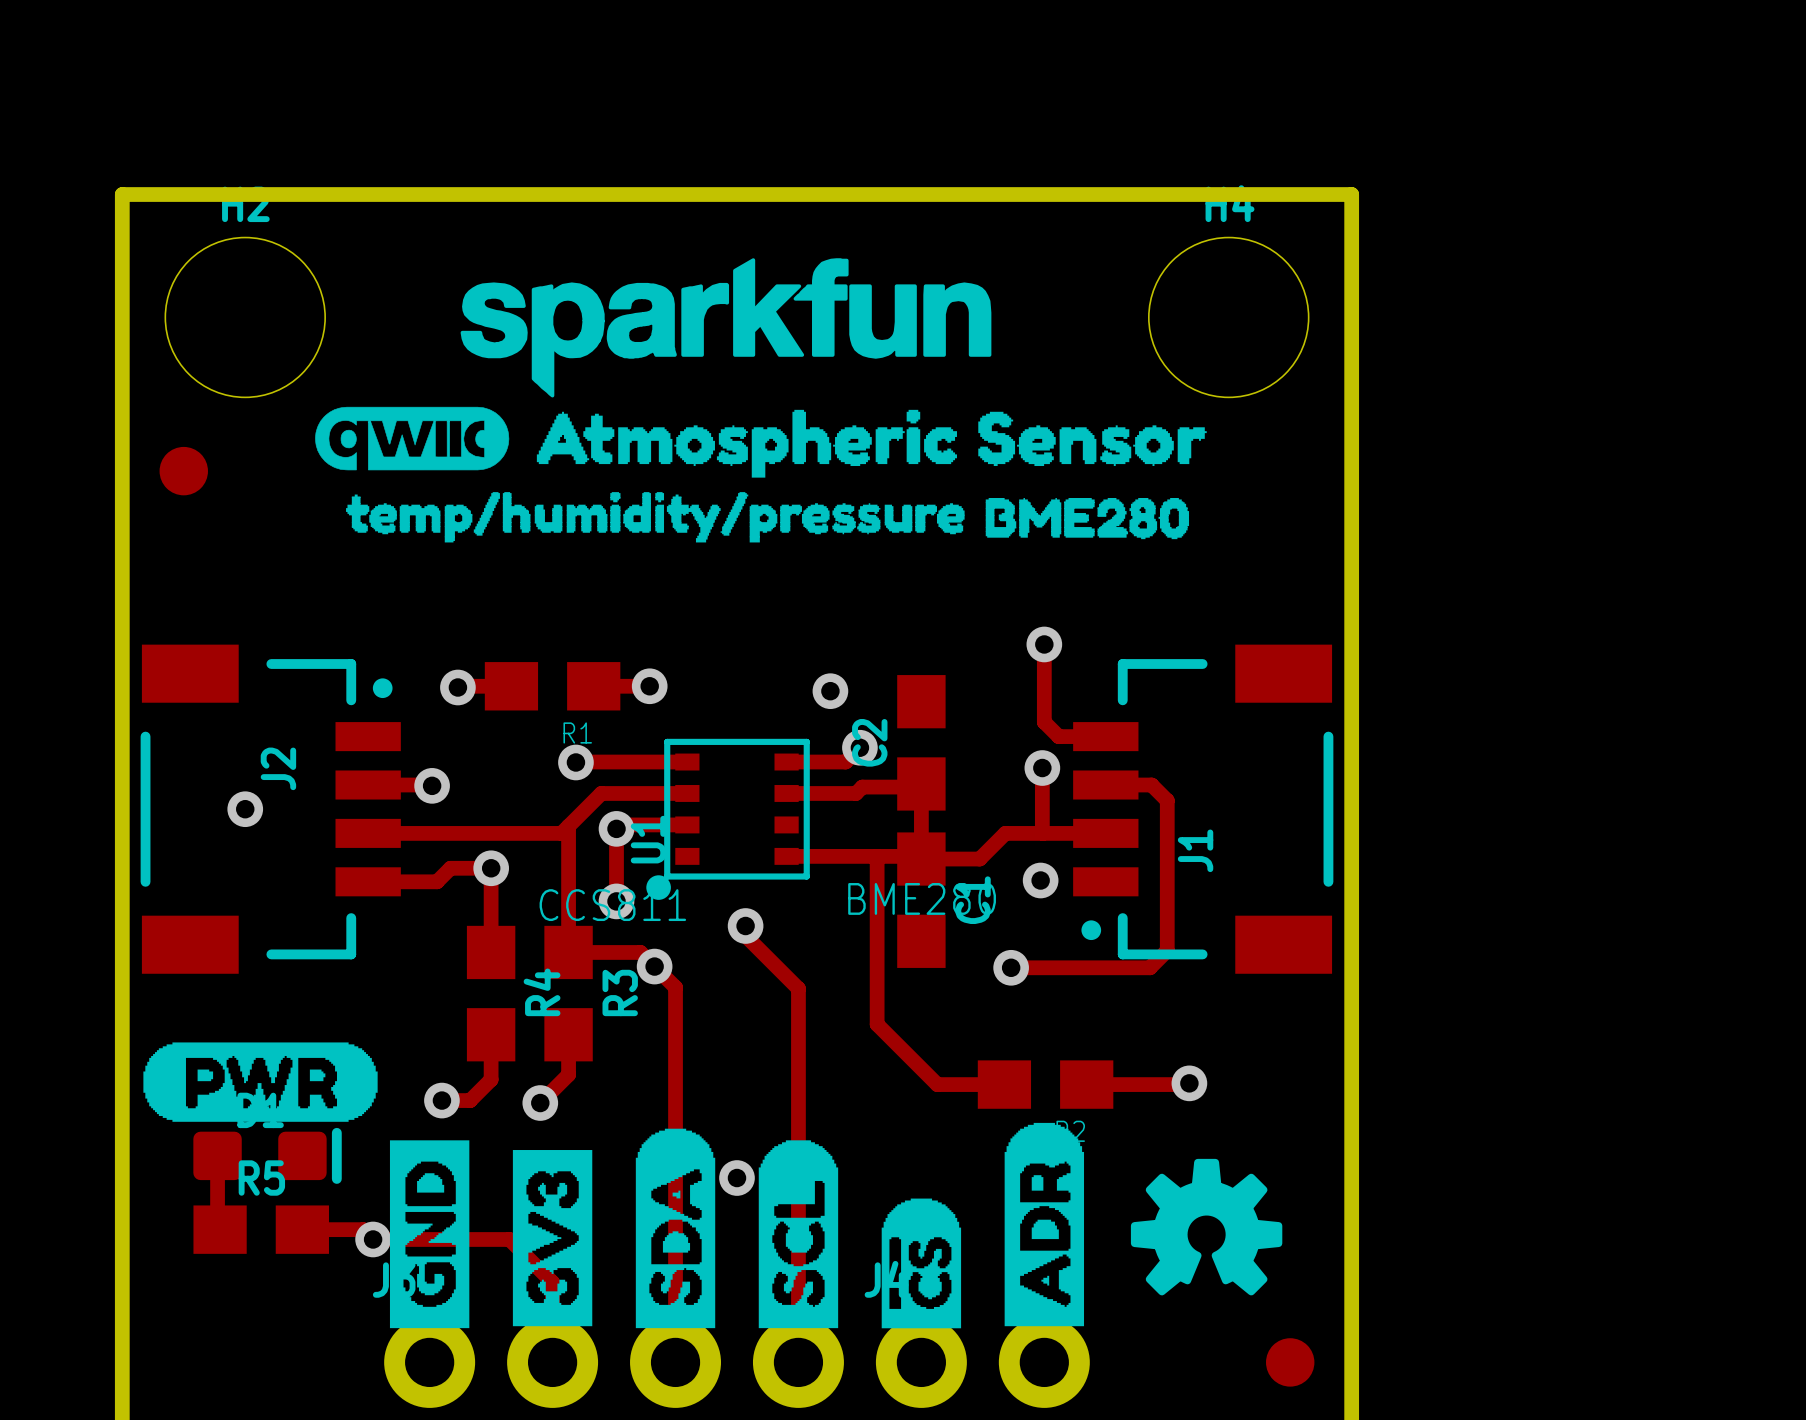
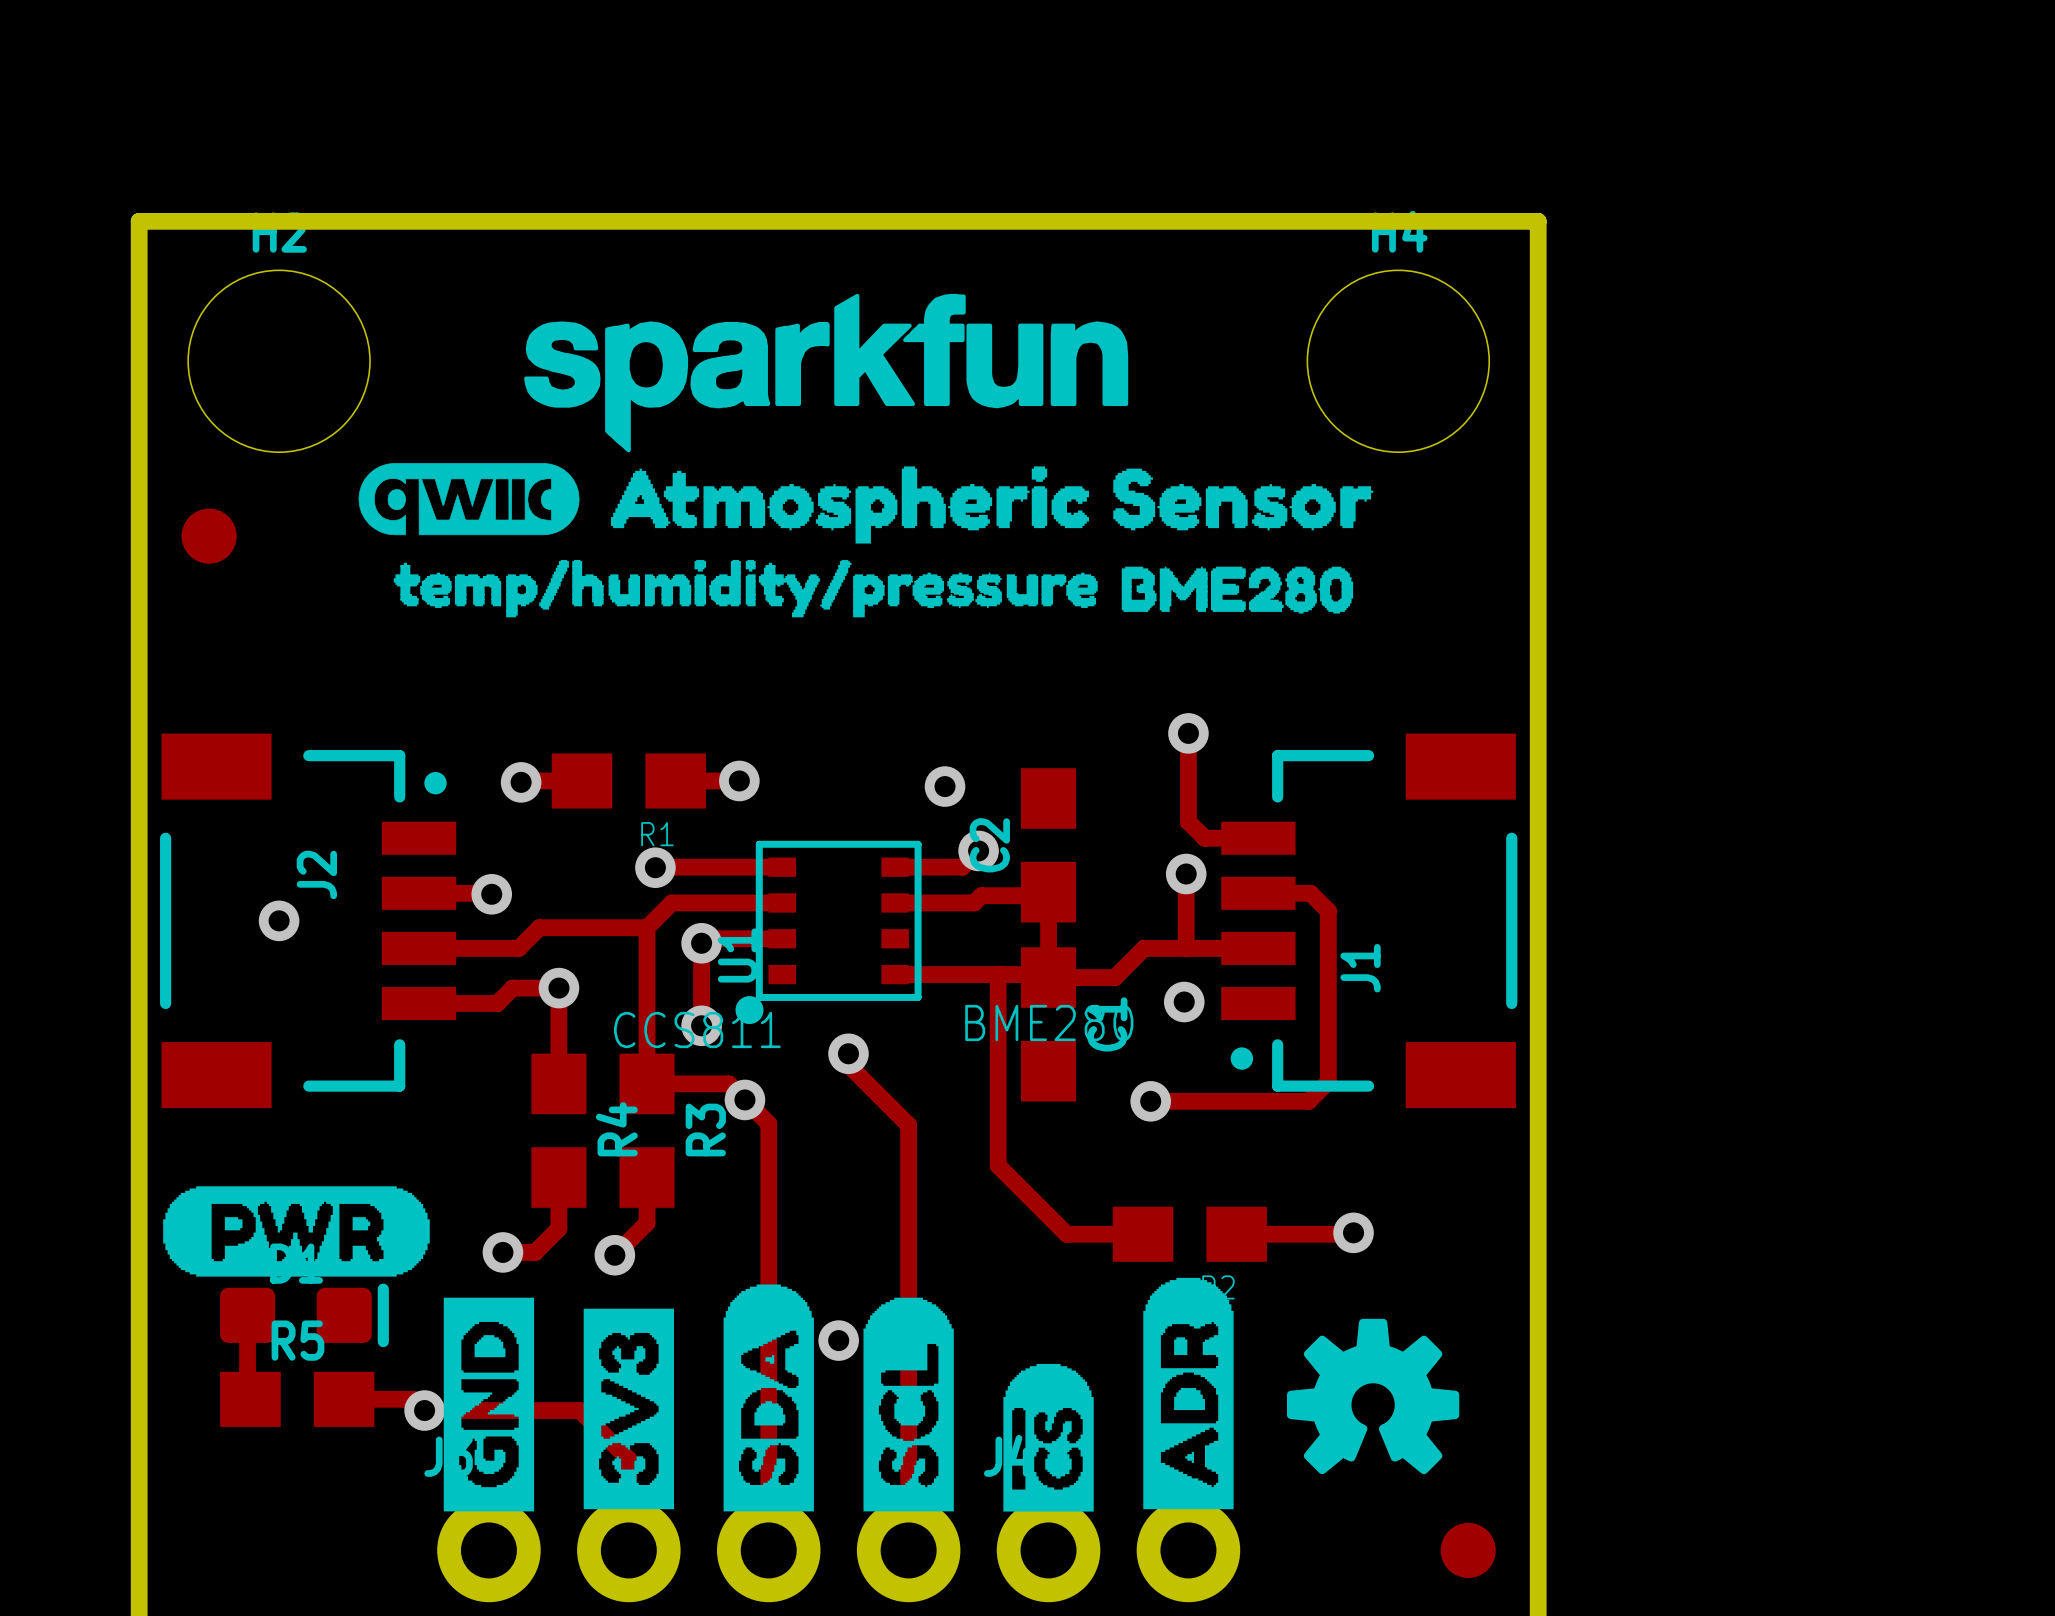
track: (601, 793) (561, 833) (455, 833) -> (647, 927) (539, 927) (518, 948)
track: none -> (684, 902) (671, 902) (647, 927)

